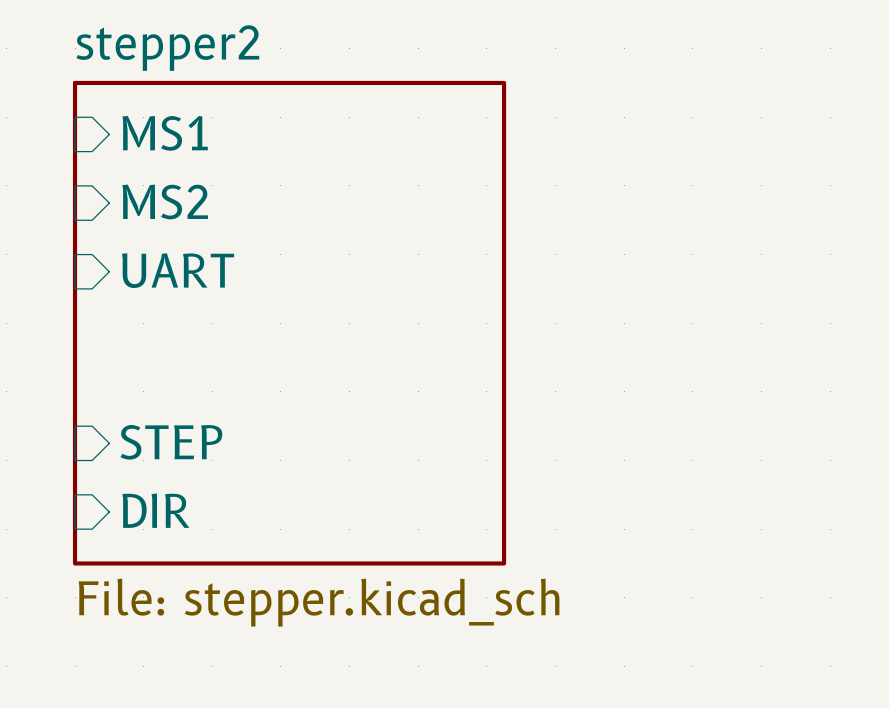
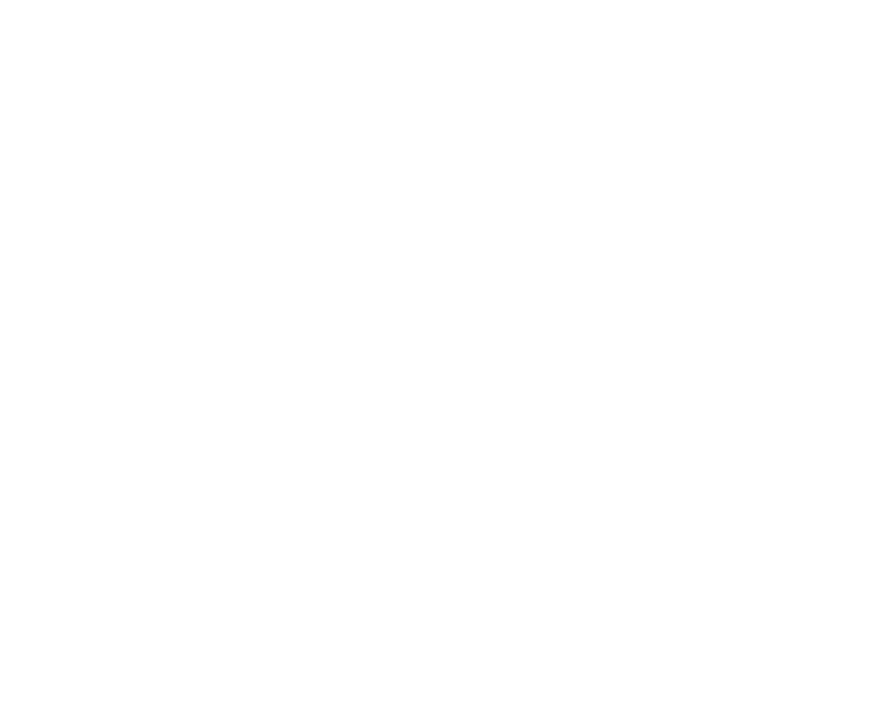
sheet pin: MS1 (165, 133) -> none
sheet pin: MS2 (165, 202) -> none
sheet pin: UART (178, 270) -> none
sheet stepper2: File: stepper.kicad_sch (289, 323) -> none
sheet pin: STEP (171, 442) -> none
sheet pin: DIR (155, 510) -> none

